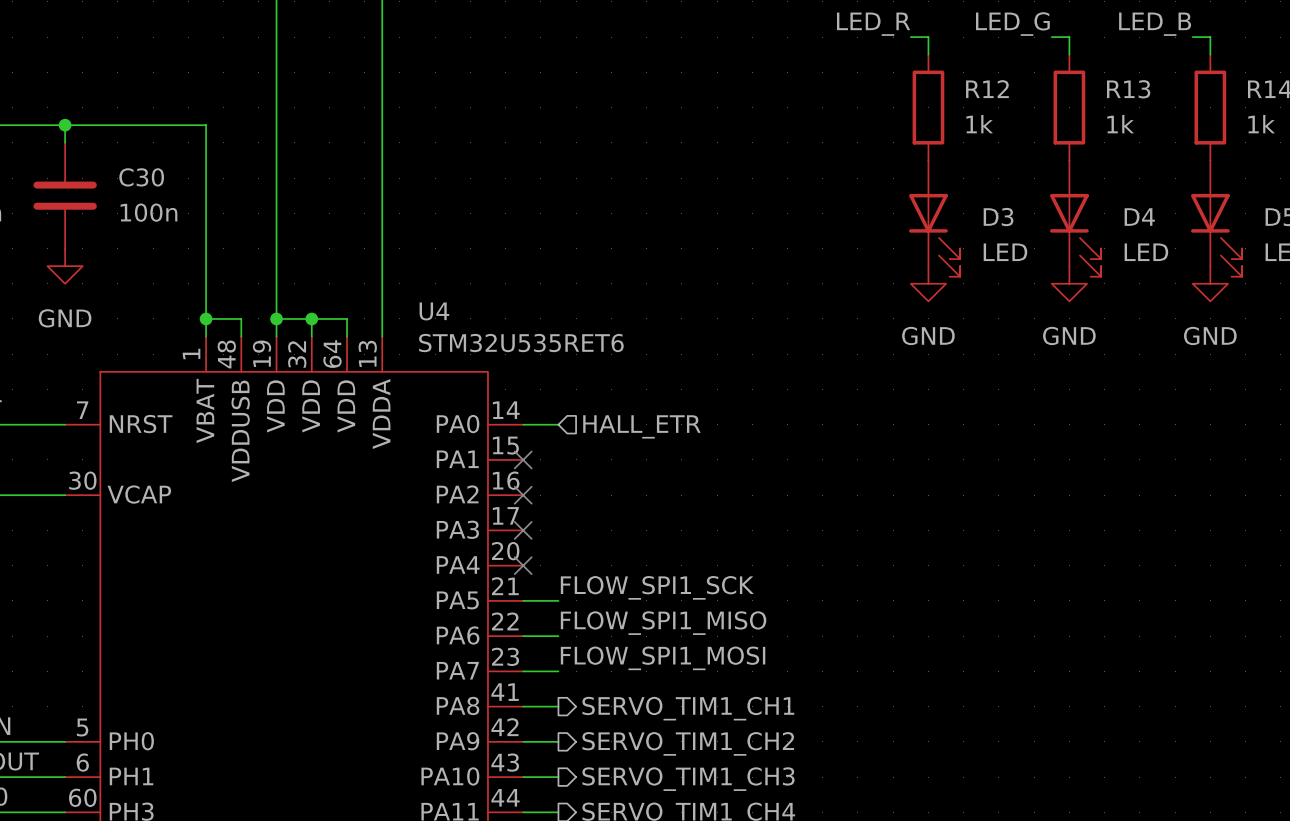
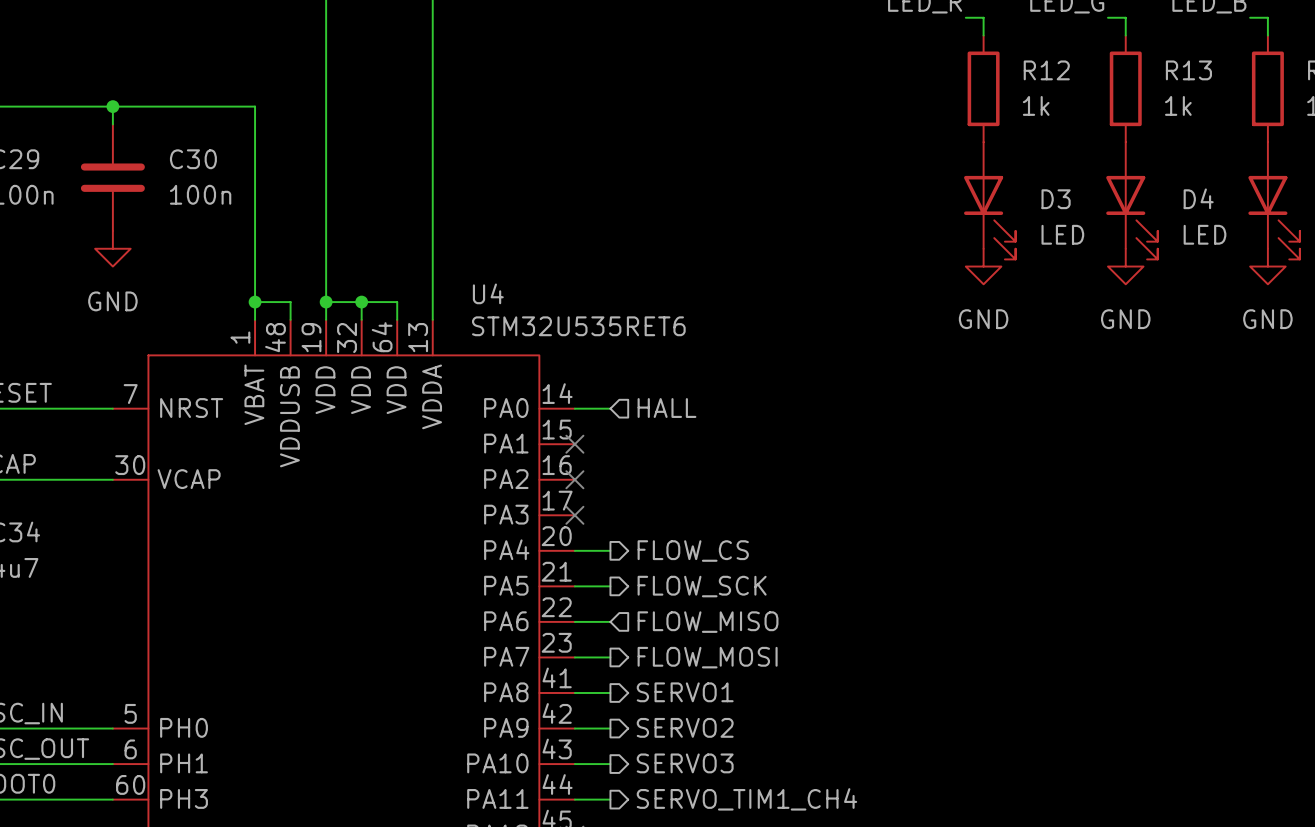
hierarchical label: HALL_ETR (641, 426) -> HALL (666, 408)
wire: none -> (574, 550) (610, 550)
no-connect mark: (523, 565) -> none
hierarchical label: none -> FLOW_CS (693, 551)
label: FLOW_SPI1_SCK (657, 587) -> none
hierarchical label: none -> FLOW_SCK (702, 586)
label: FLOW_SPI1_MISO (663, 623) -> none
hierarchical label: none -> FLOW_MISO (708, 622)
label: FLOW_SPI1_MOSI (663, 658) -> none
hierarchical label: none -> FLOW_MOSI (707, 657)
hierarchical label: SERVO_TIM1_CH1 (688, 708) -> SERVO1 (685, 692)
hierarchical label: SERVO_TIM1_CH2 (688, 743) -> SERVO2 (685, 727)
hierarchical label: SERVO_TIM1_CH3 (688, 779) -> SERVO3 (685, 763)

